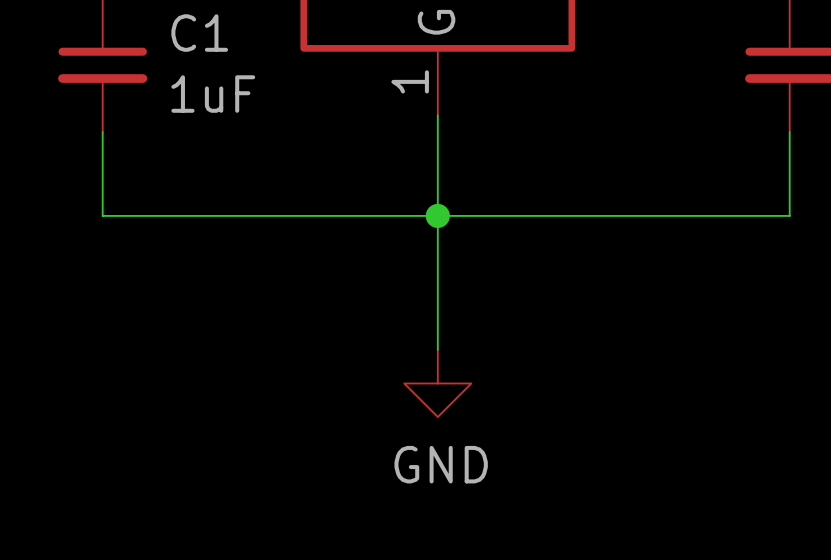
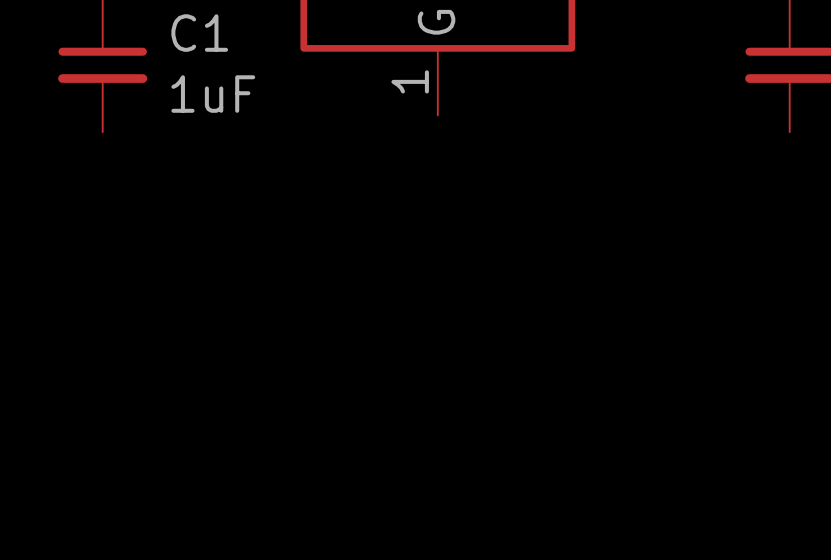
wire: (437, 115) (437, 349) -> none
wire: (102, 132) (102, 215) (789, 215) (789, 132) -> none
junction: (437, 215) -> none
power symbol: GND (437, 383) -> none

